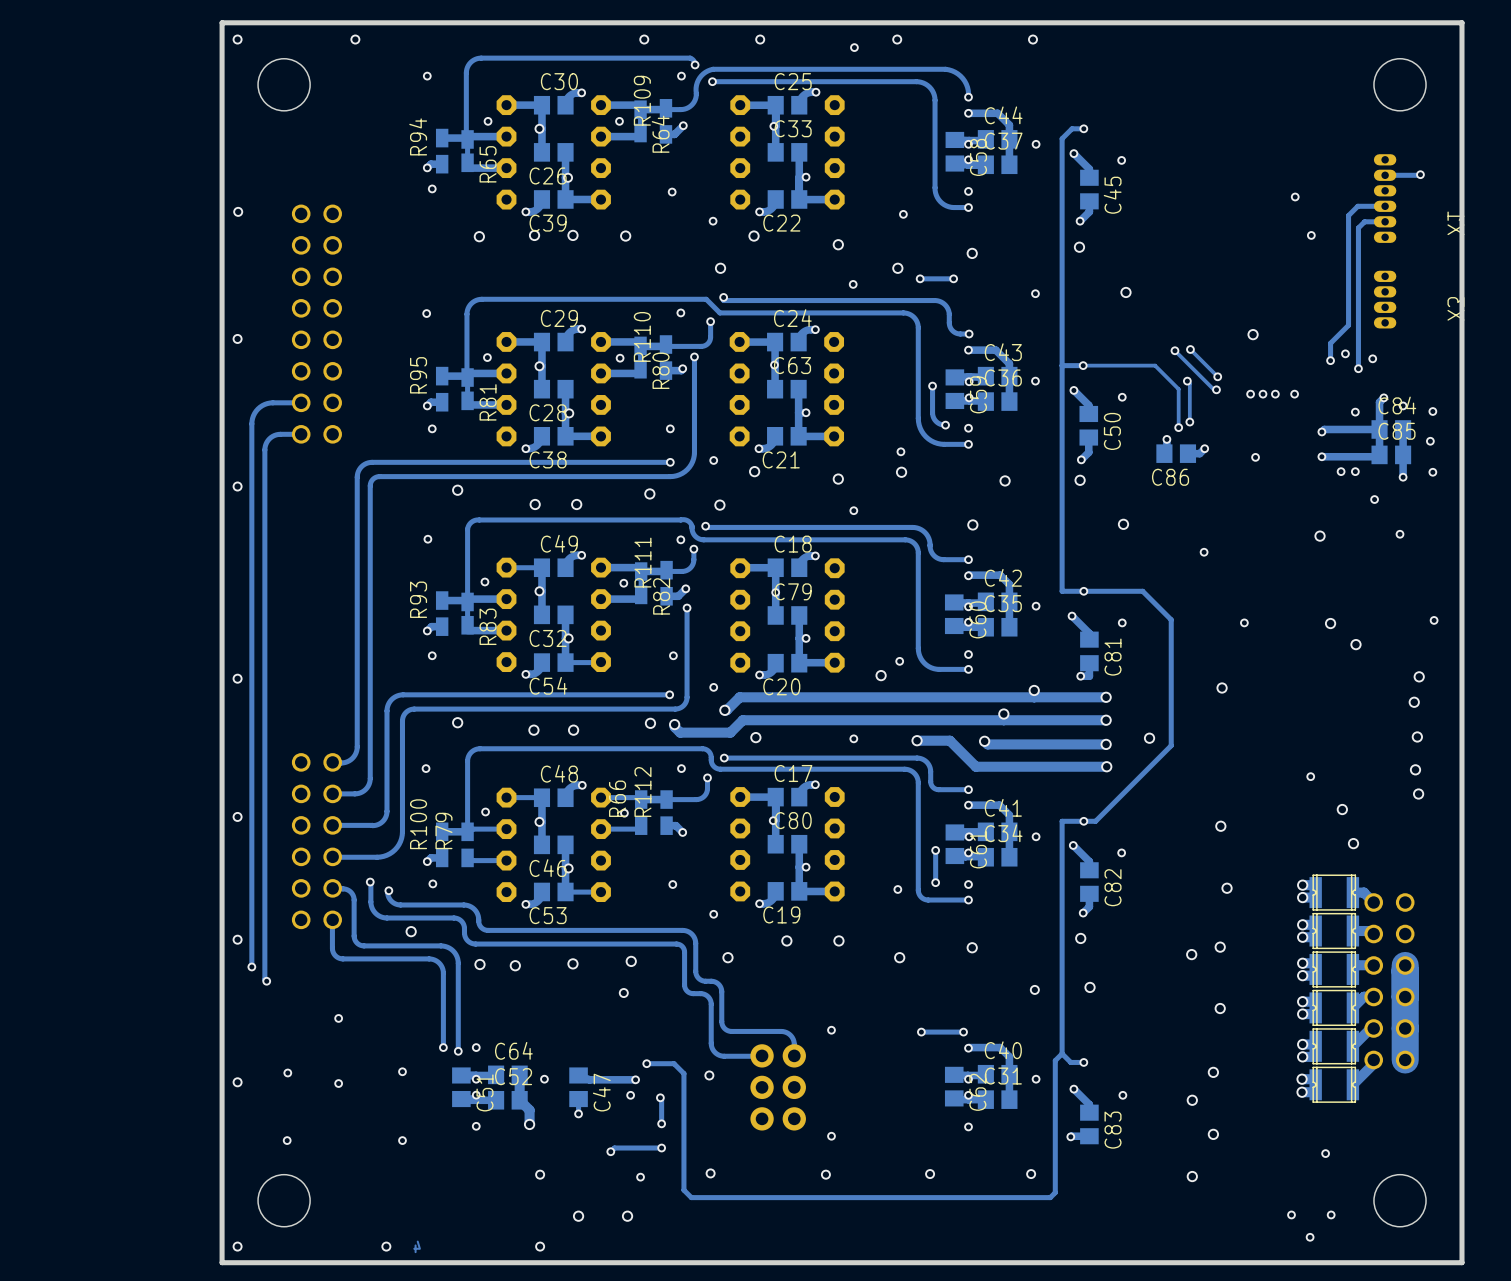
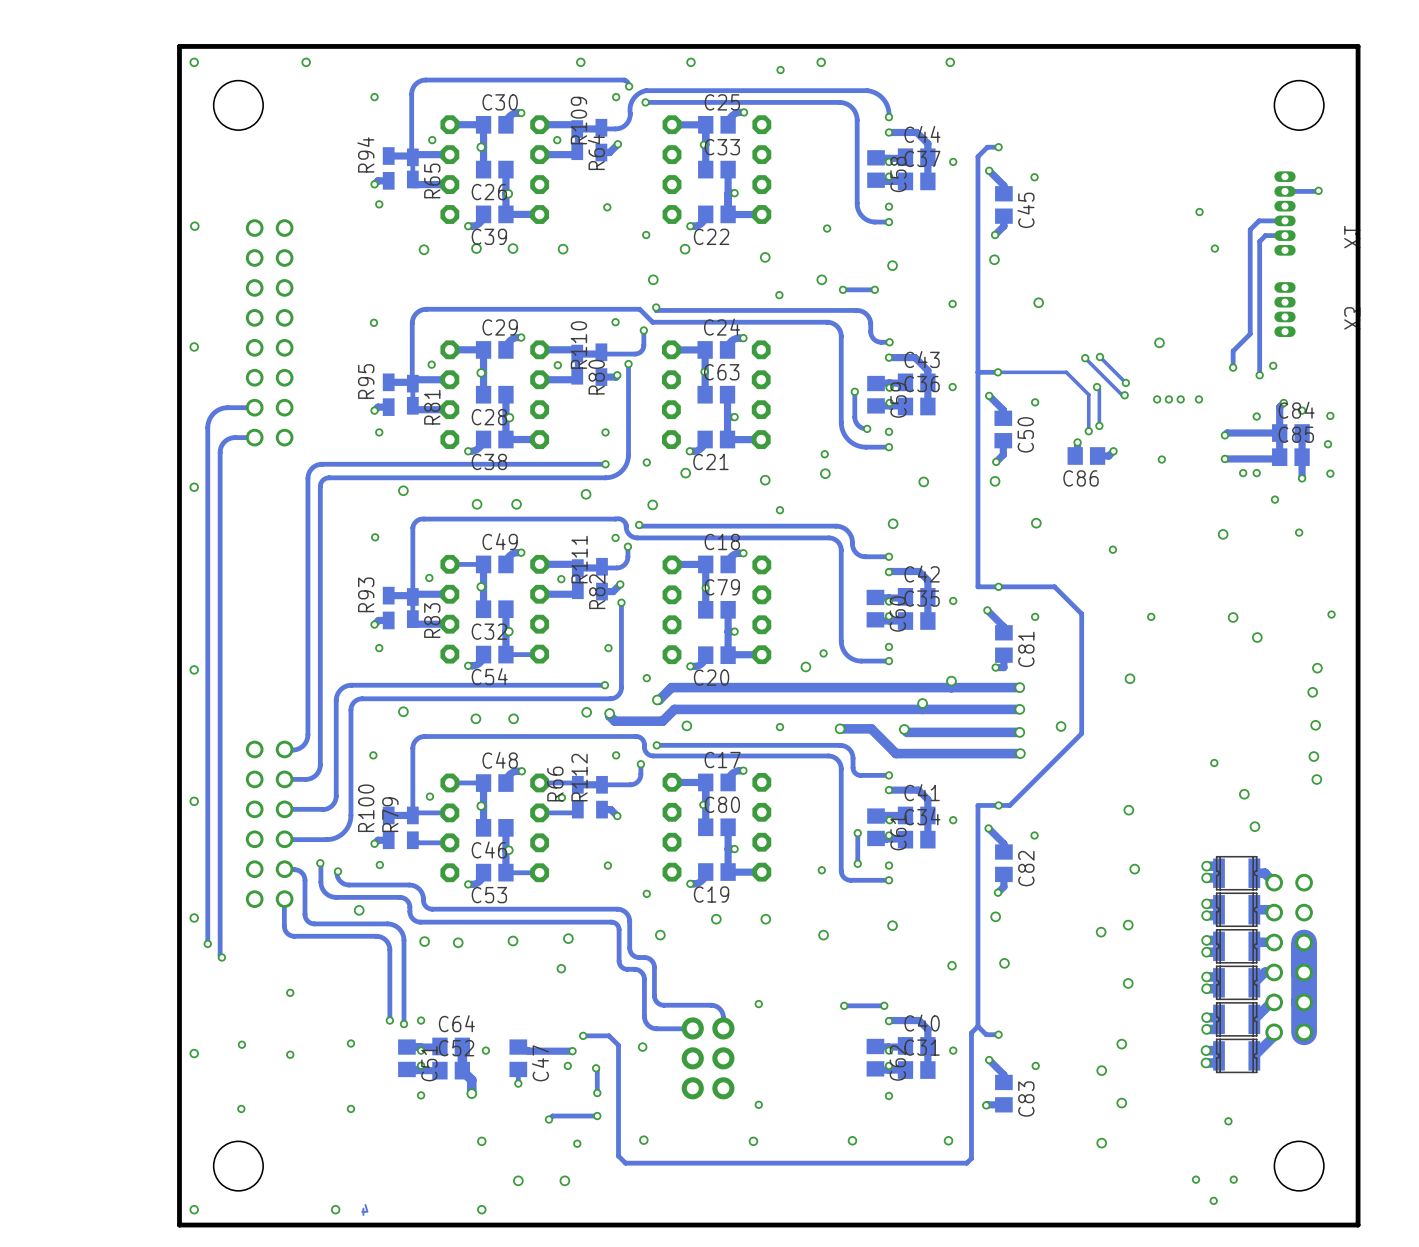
via: (1345, 353) -> none

